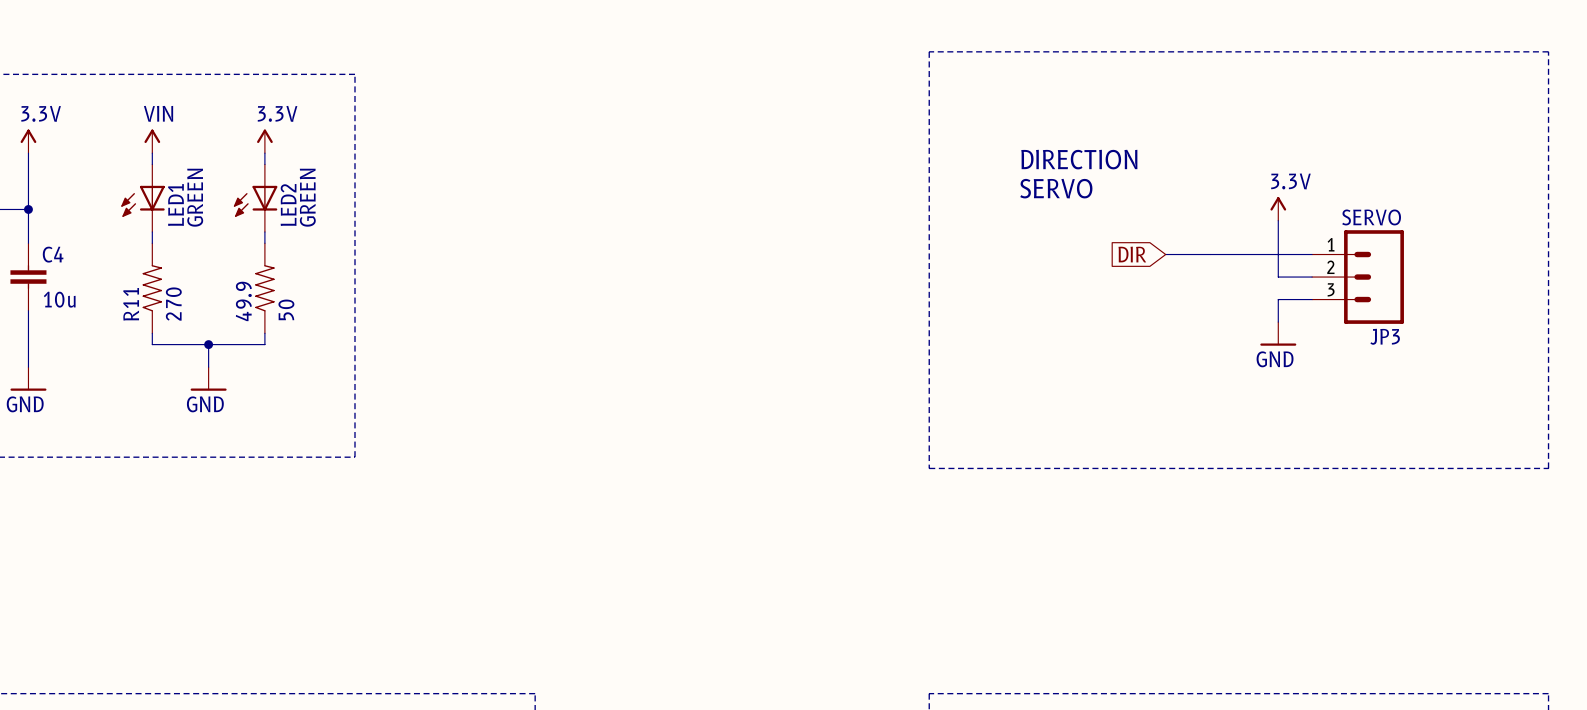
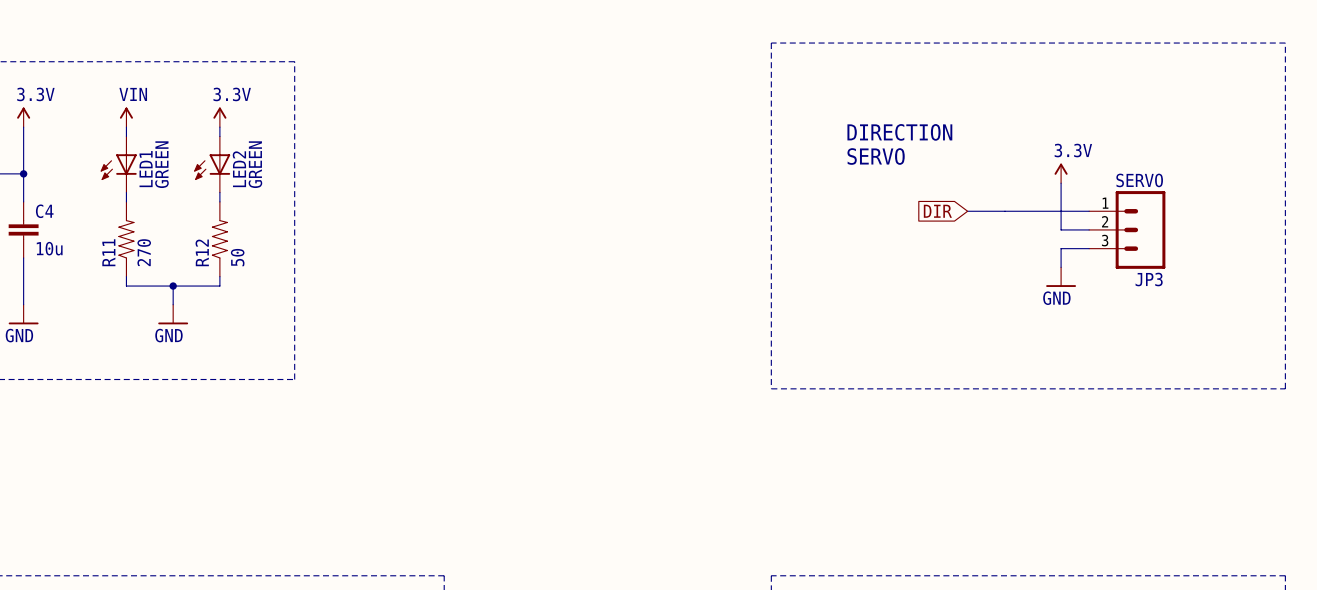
49.9 name: 49.9 (243, 301) -> R12 (202, 252)

